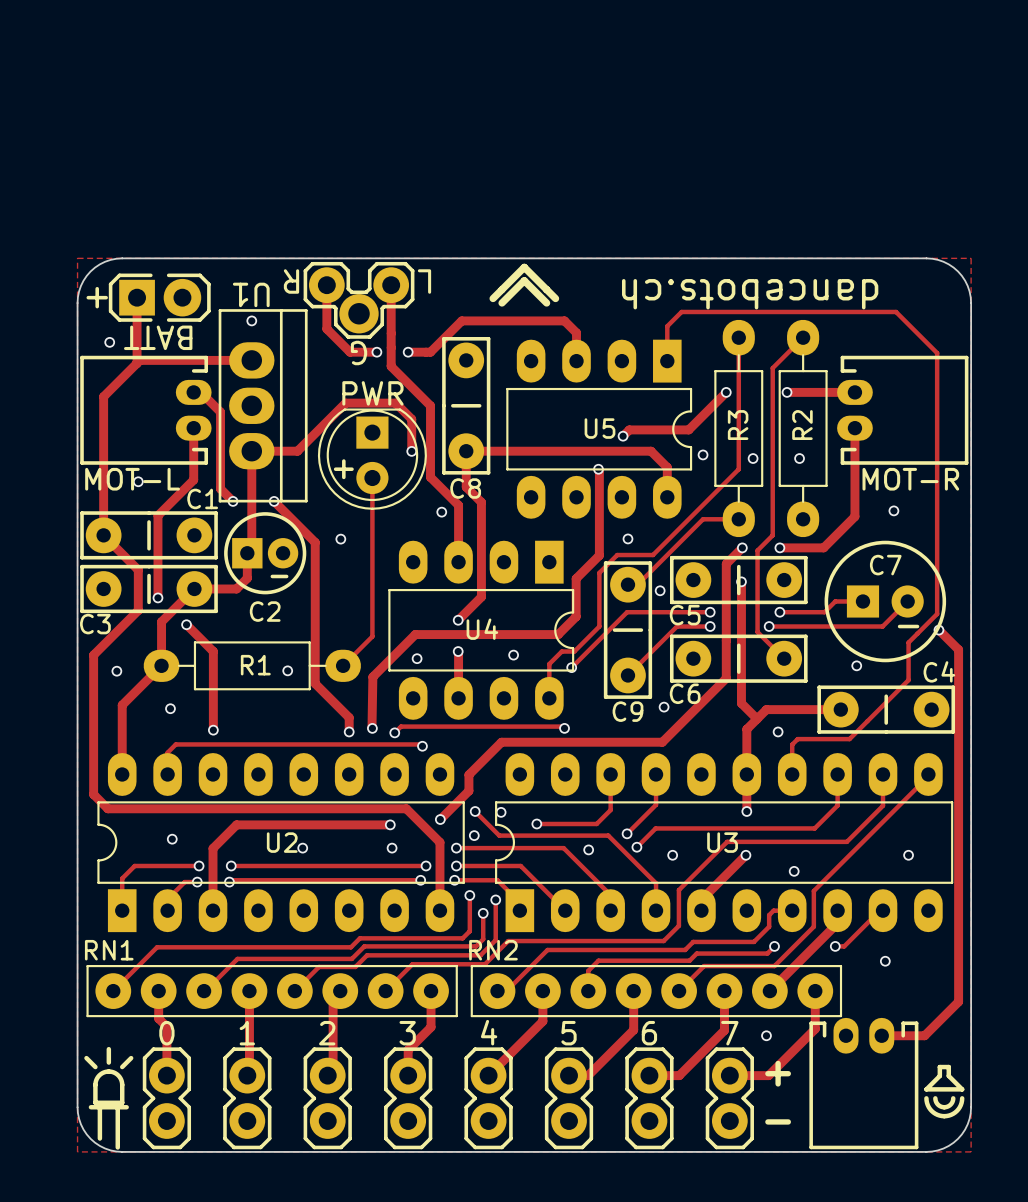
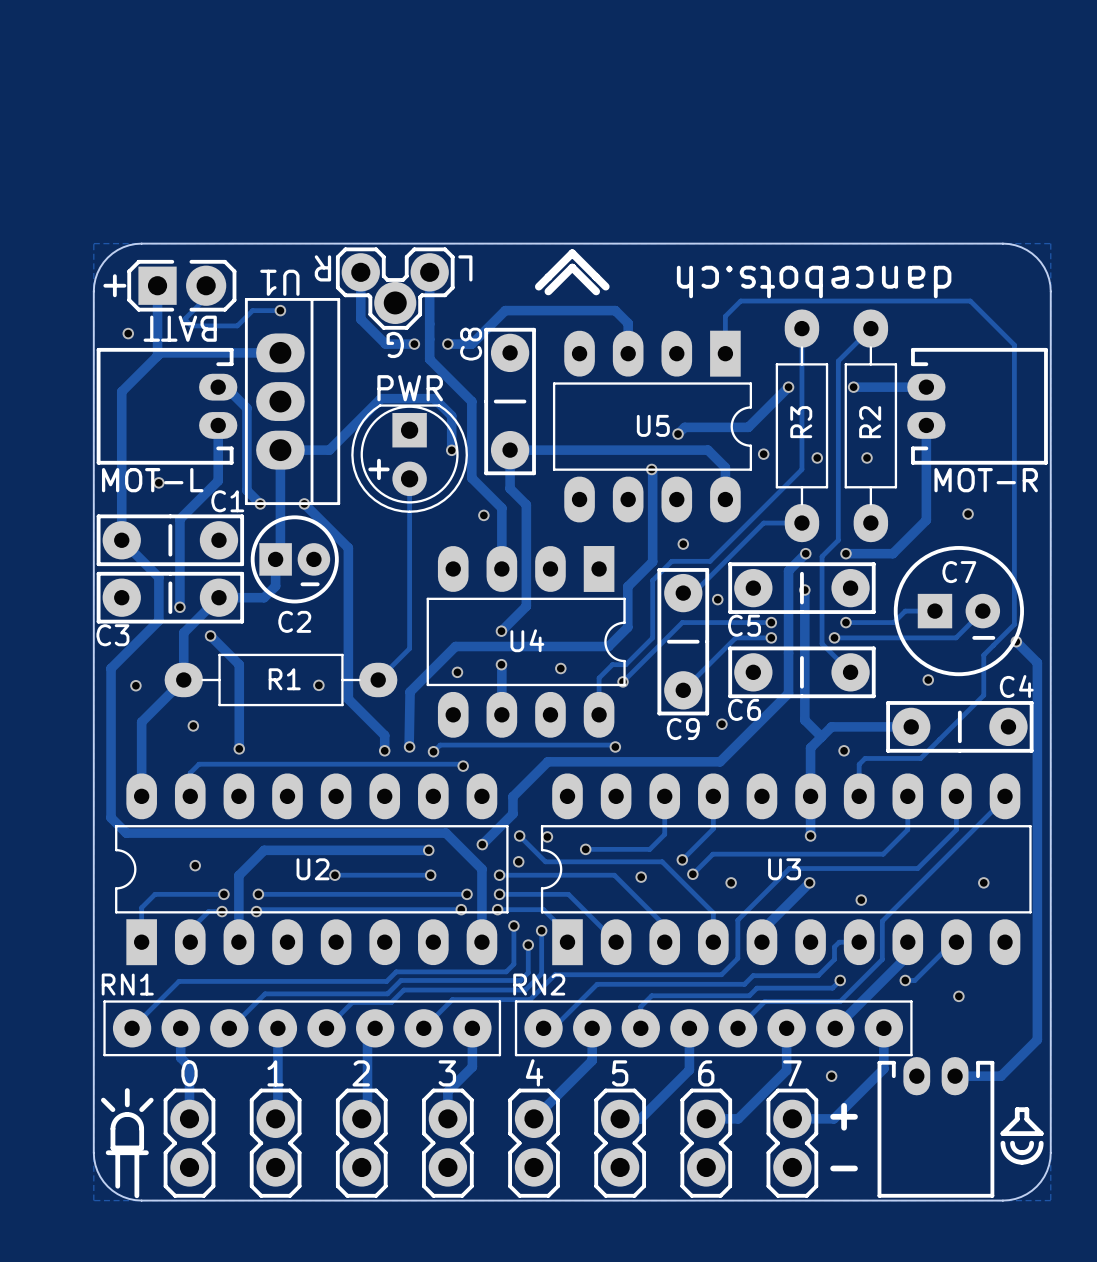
track: none -> (206, 297) (185, 318) (191, 325) (237, 325) (252, 310) (280, 310)
C8 name rotation: 0° (465, 488) -> 90° counterclockwise (471, 344)
C8 name position: C8 (465, 488) -> C8 (471, 344)
via: (340, 539) -> none
track: none -> (334, 875) (430, 875)

